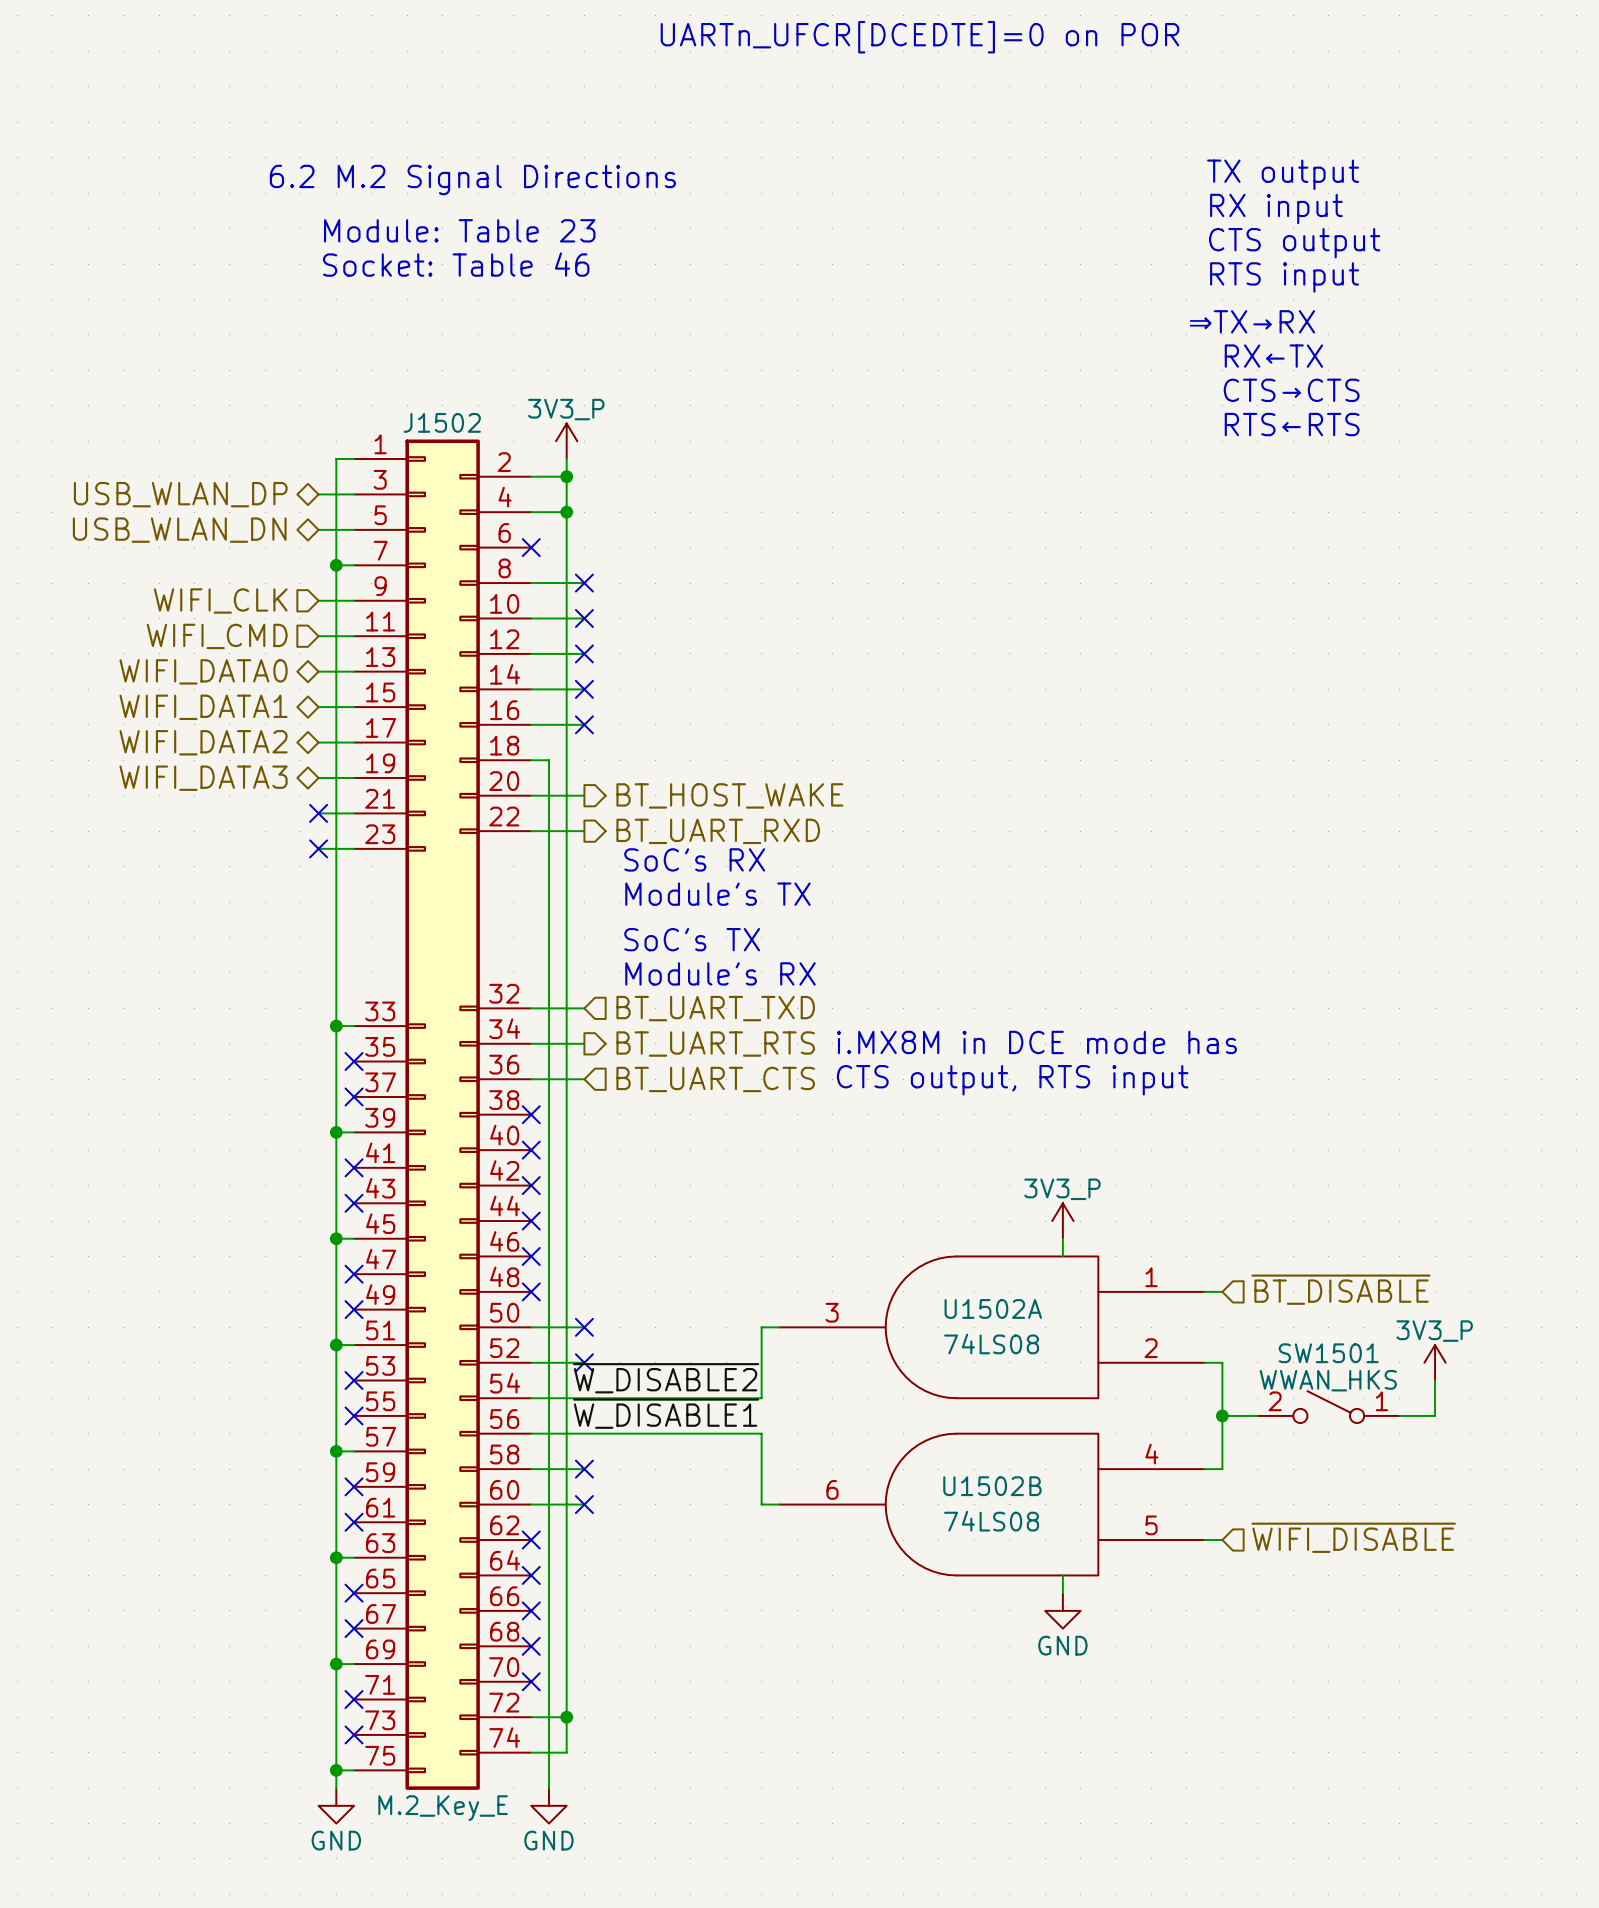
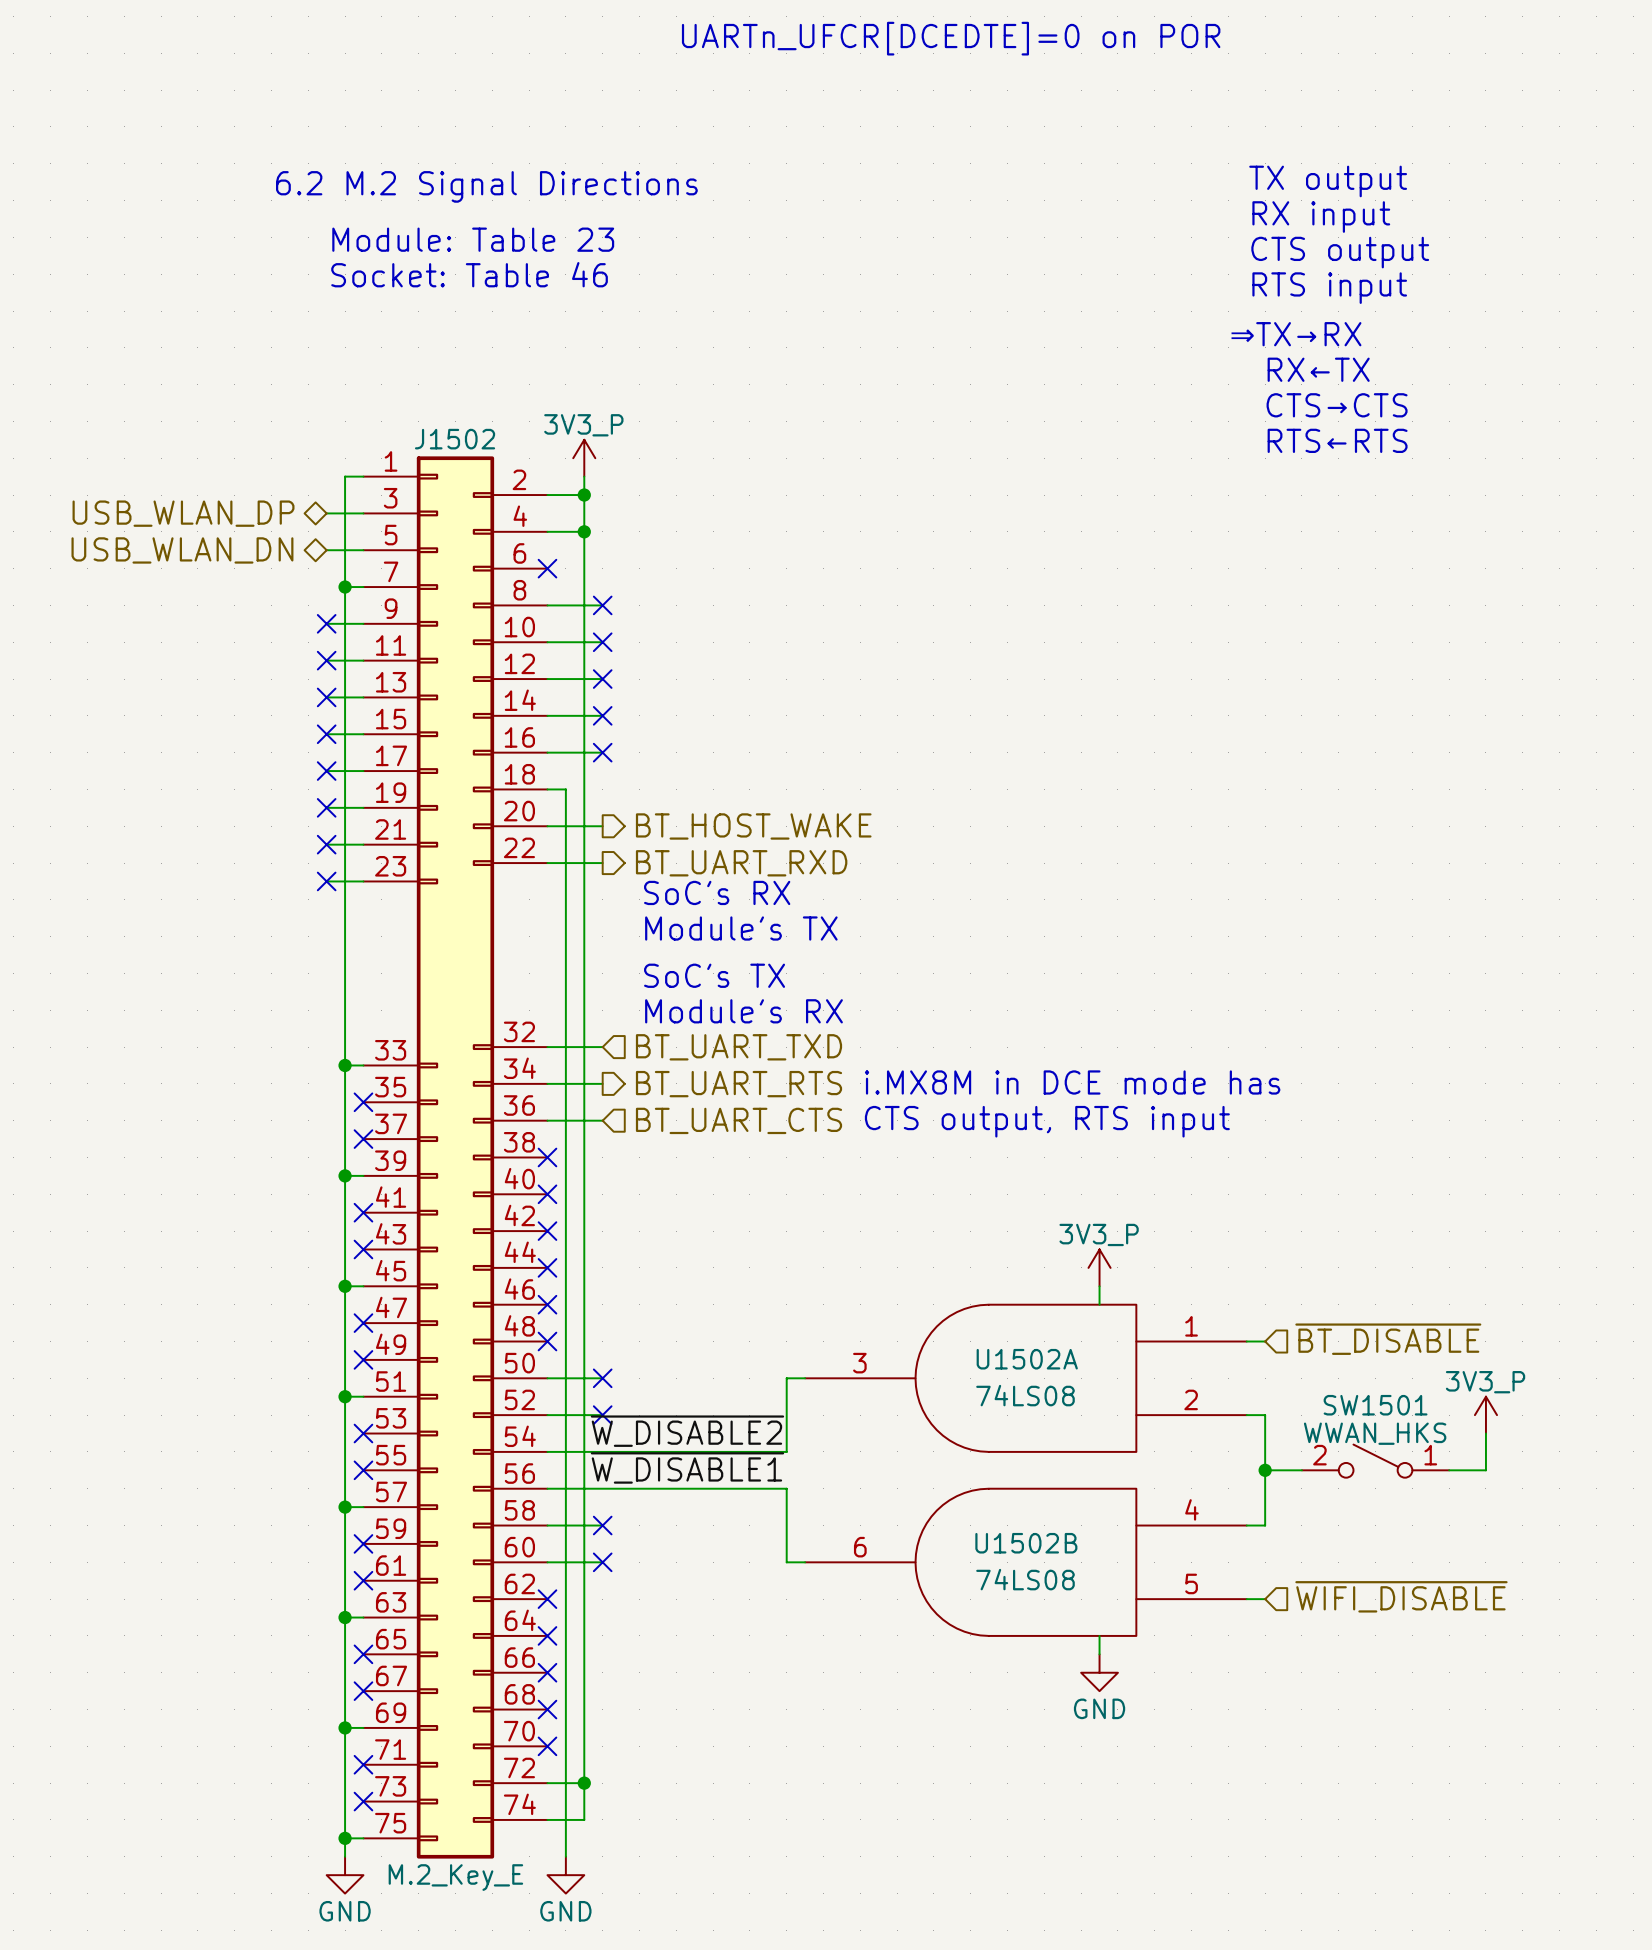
hierarchical label: WIFI_CLK (220, 600) -> none
no-connect mark: none -> (326, 623)
hierarchical label: WIFI_CMD (217, 636) -> none
no-connect mark: none -> (326, 660)
hierarchical label: WIFI_DATA0 (203, 671) -> none
no-connect mark: none -> (326, 697)
hierarchical label: WIFI_DATA1 (203, 707) -> none
no-connect mark: none -> (326, 734)
hierarchical label: WIFI_DATA2 (203, 742) -> none
no-connect mark: none -> (326, 771)
no-connect mark: none -> (326, 807)
hierarchical label: WIFI_DATA3 (203, 778) -> none

